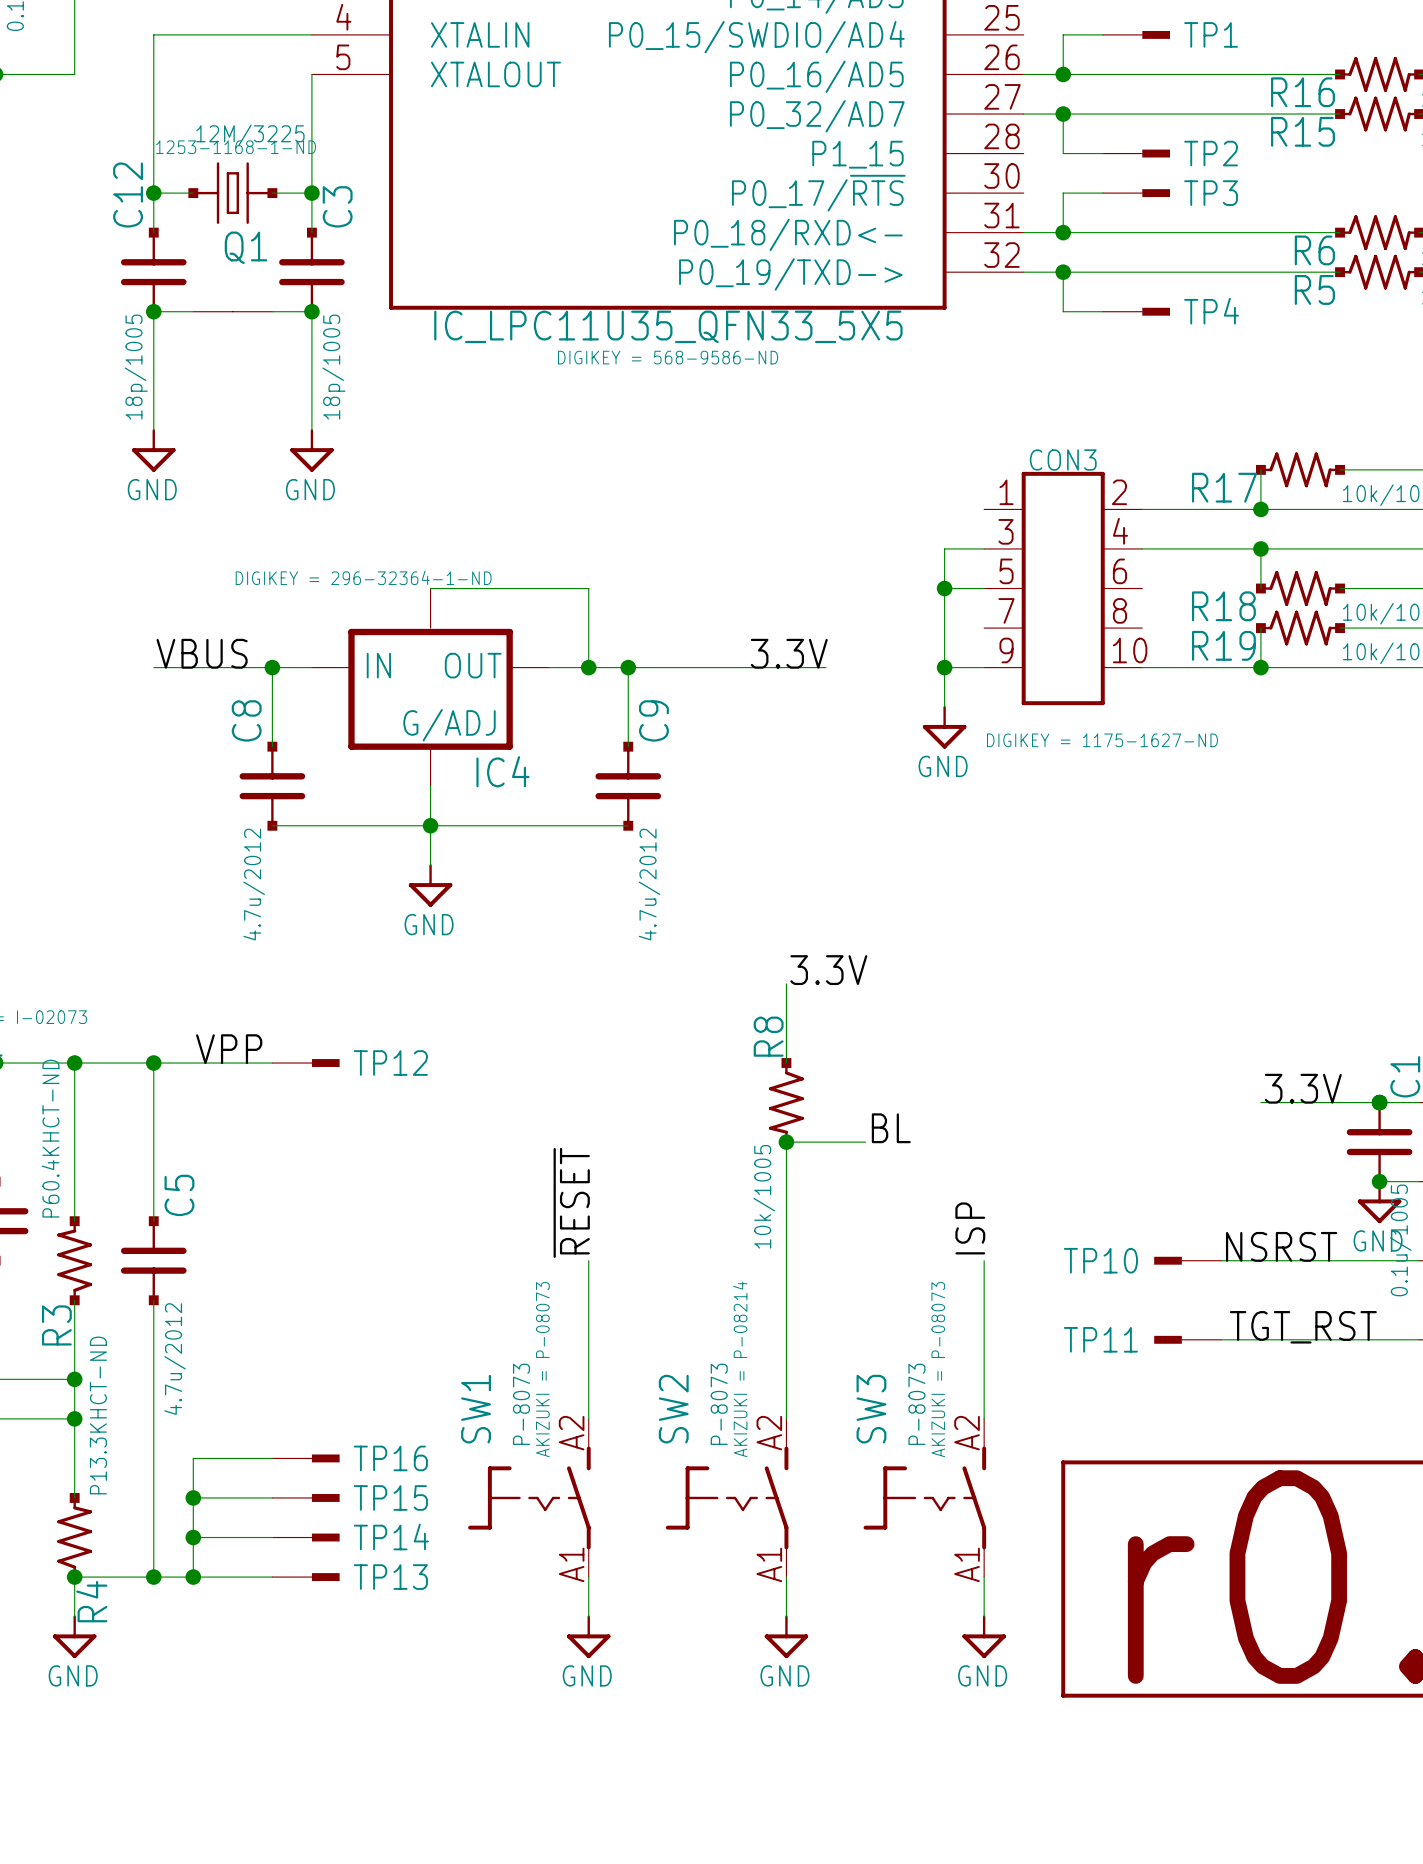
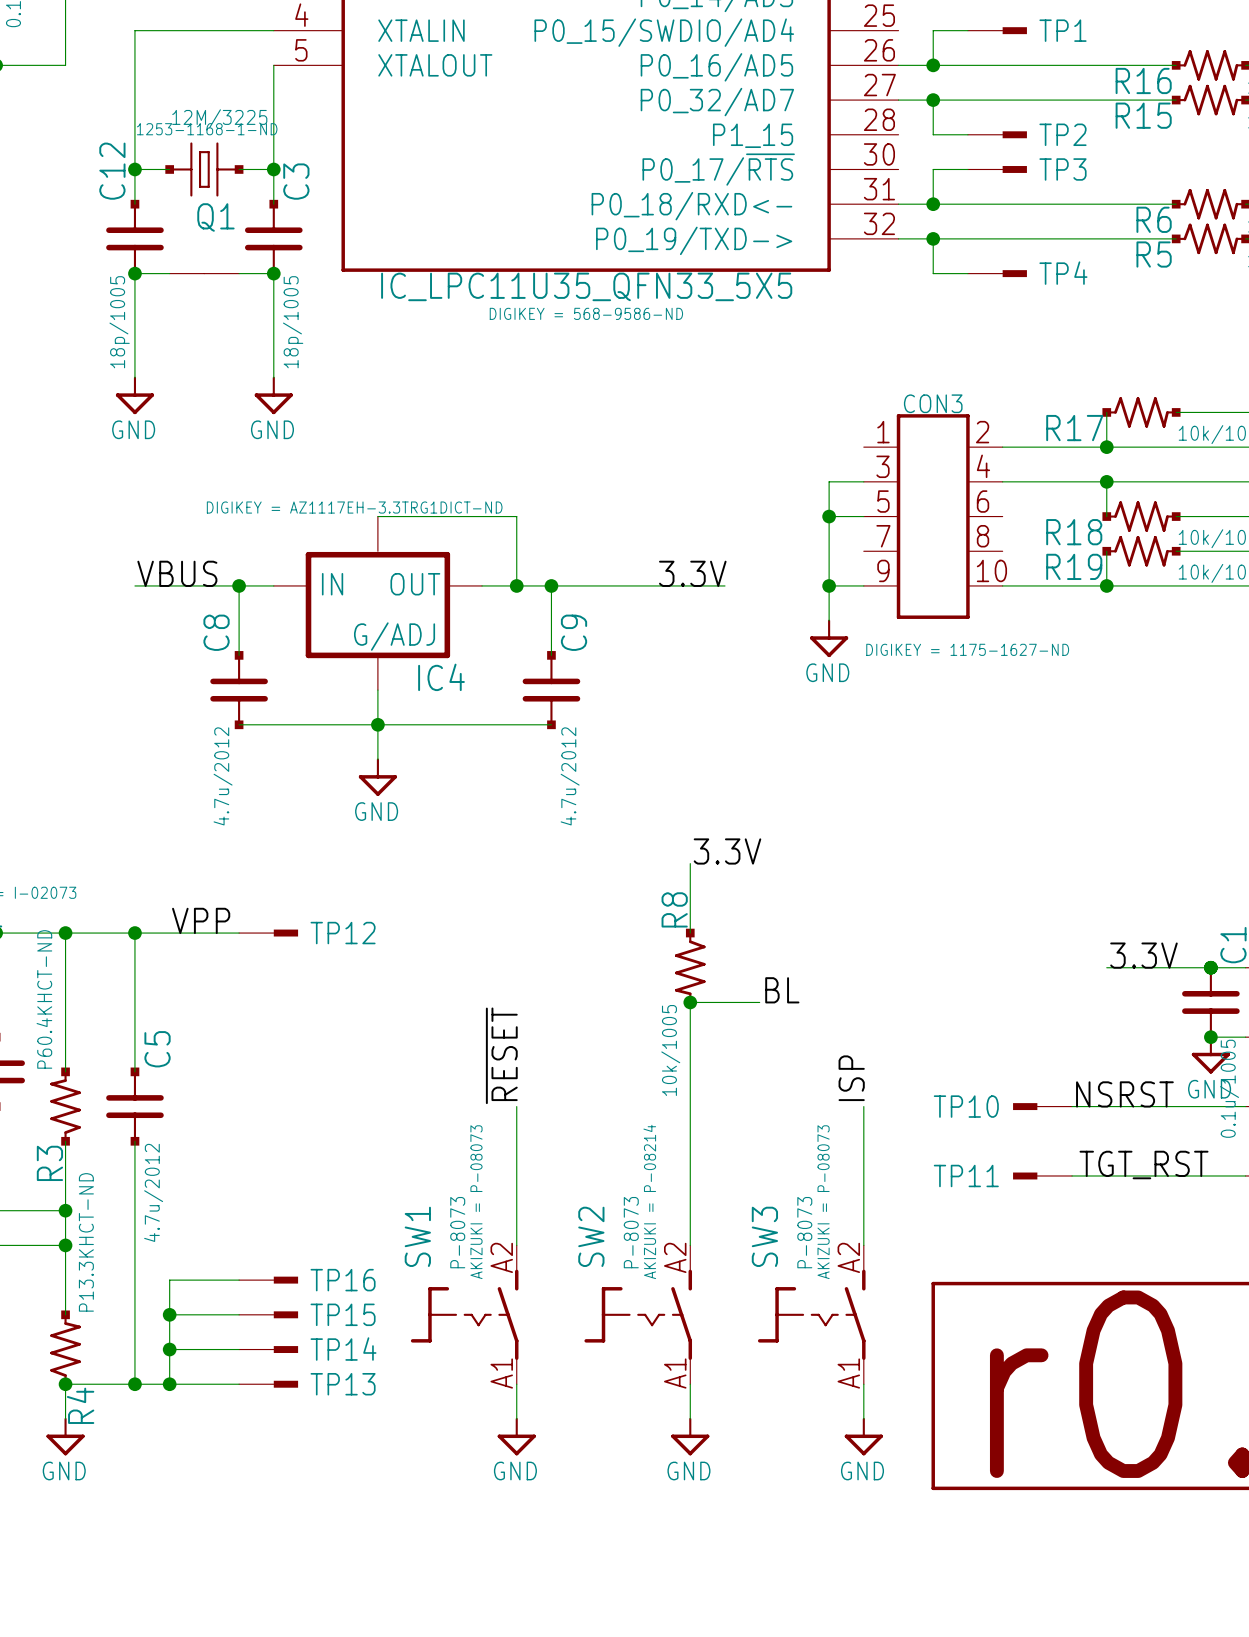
IC4 text: DIGIKEY = 296-32364-1-ND (363, 577) -> DIGIKEY = AZ1117EH-3.3TRG1DICT-ND (354, 507)

